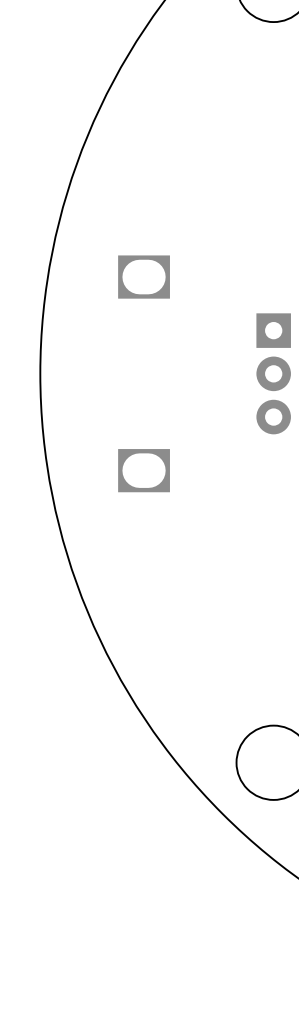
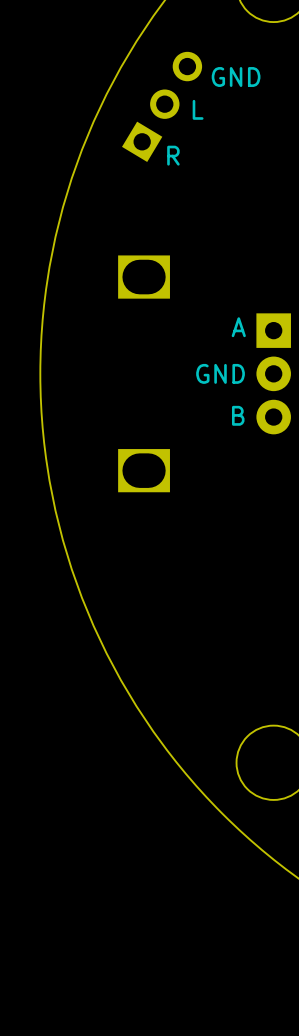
text: none -> GND (236, 77)
part: none -> (162, 106)
text: none -> L (198, 109)
text: none -> R (173, 155)
text: none -> A (238, 327)
text: none -> GND (220, 373)
text: none -> B (238, 415)

